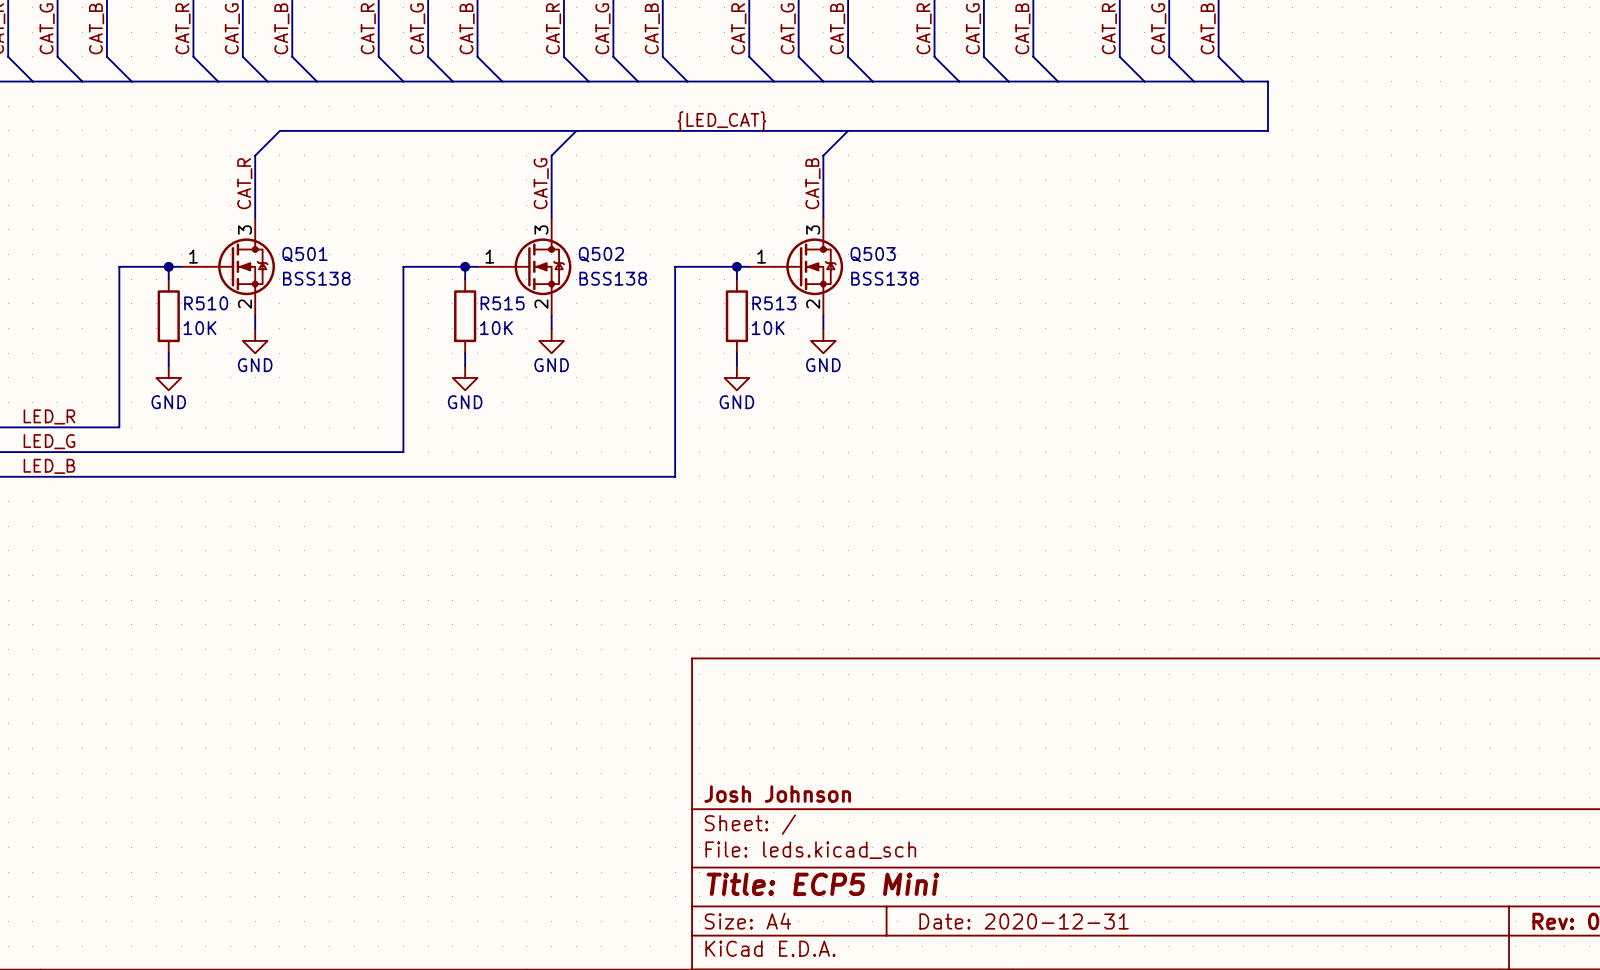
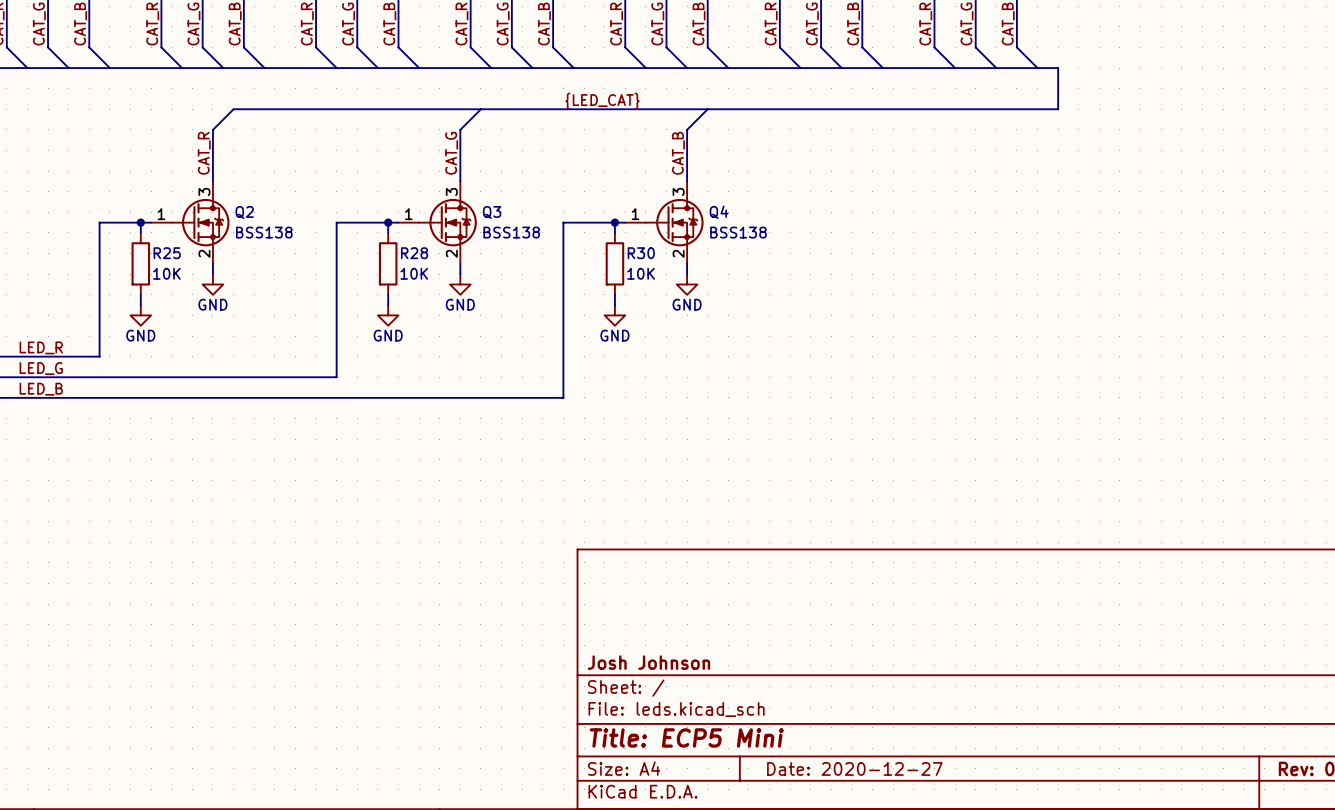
Q501 name: Q501 (304, 254) -> Q2 (244, 212)
Q502 name: Q502 (601, 254) -> Q3 (492, 212)
Q503 name: Q503 (873, 254) -> Q4 (719, 212)
R510 name: R510 (206, 303) -> R25 (167, 253)
R515 name: R515 (502, 303) -> R28 (414, 253)
R513 name: R513 (774, 303) -> R30 (641, 253)
title block: Date: 2020-12-31 (1024, 921) -> Date: 2020-12-27 (854, 768)

